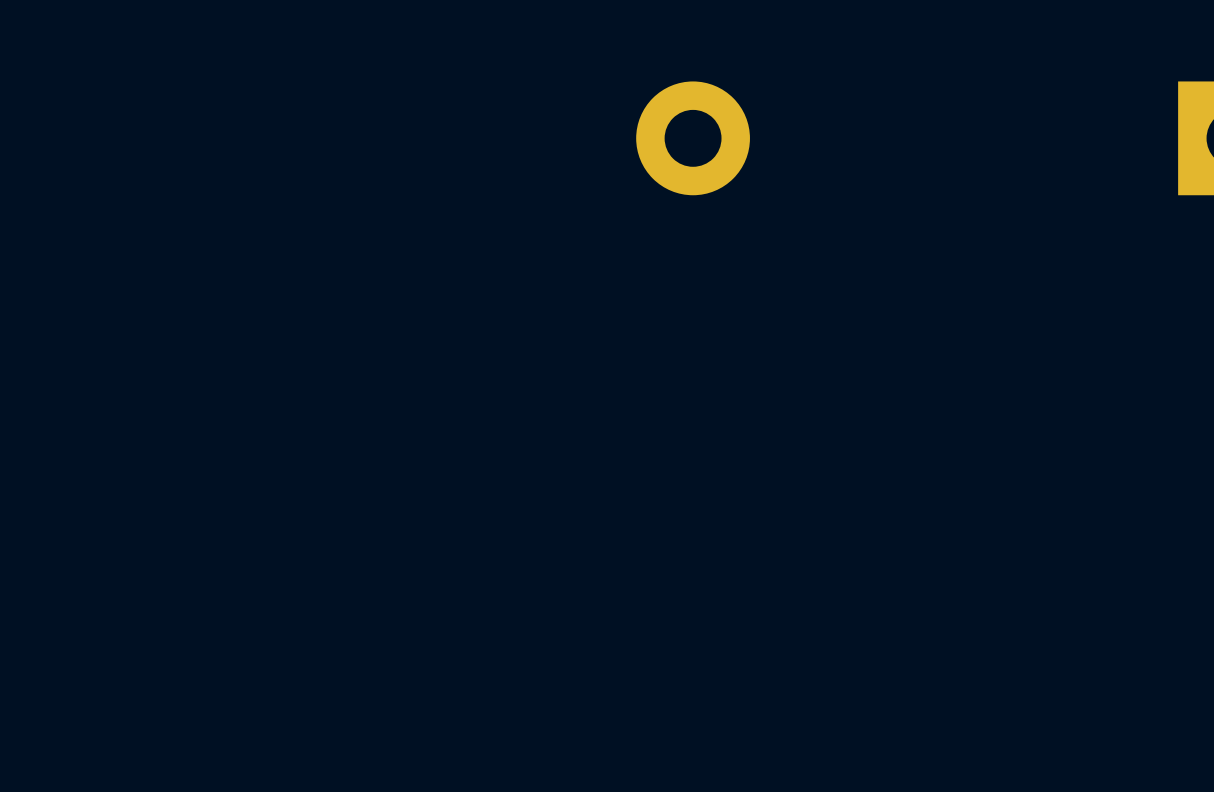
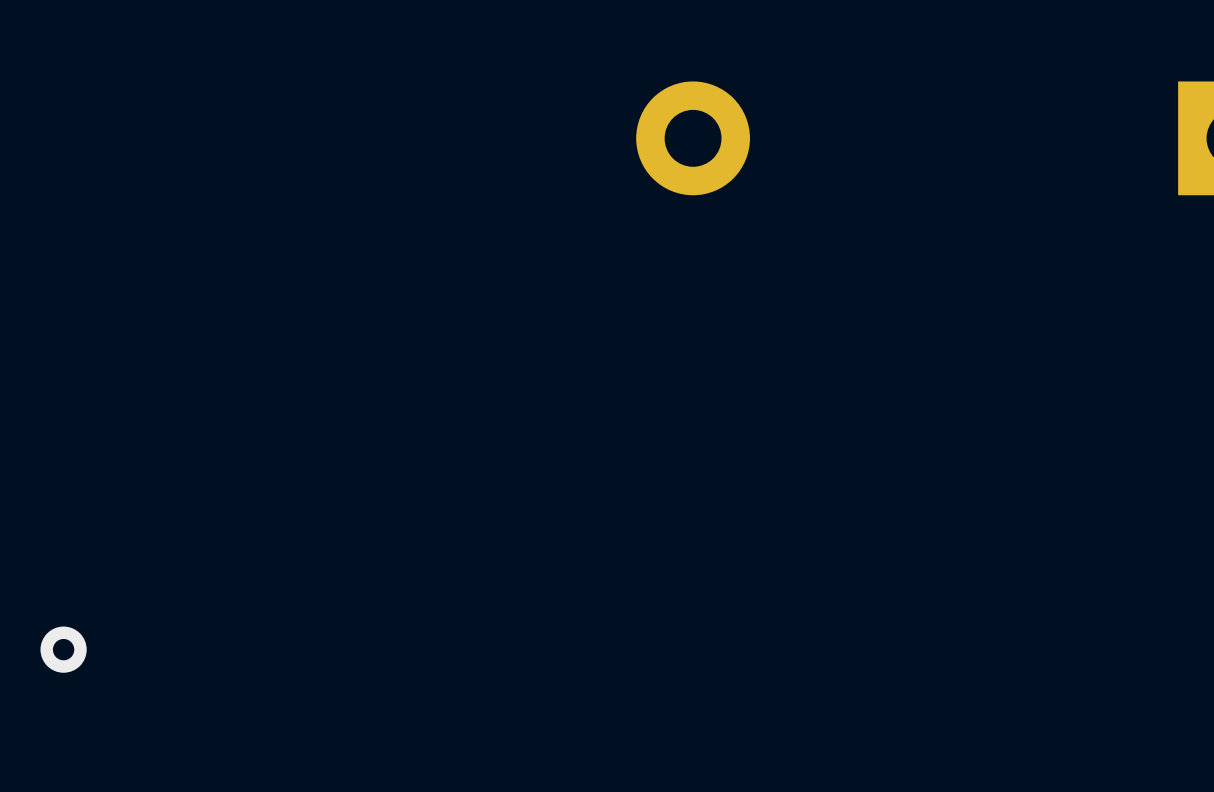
via: none -> (63, 649)

